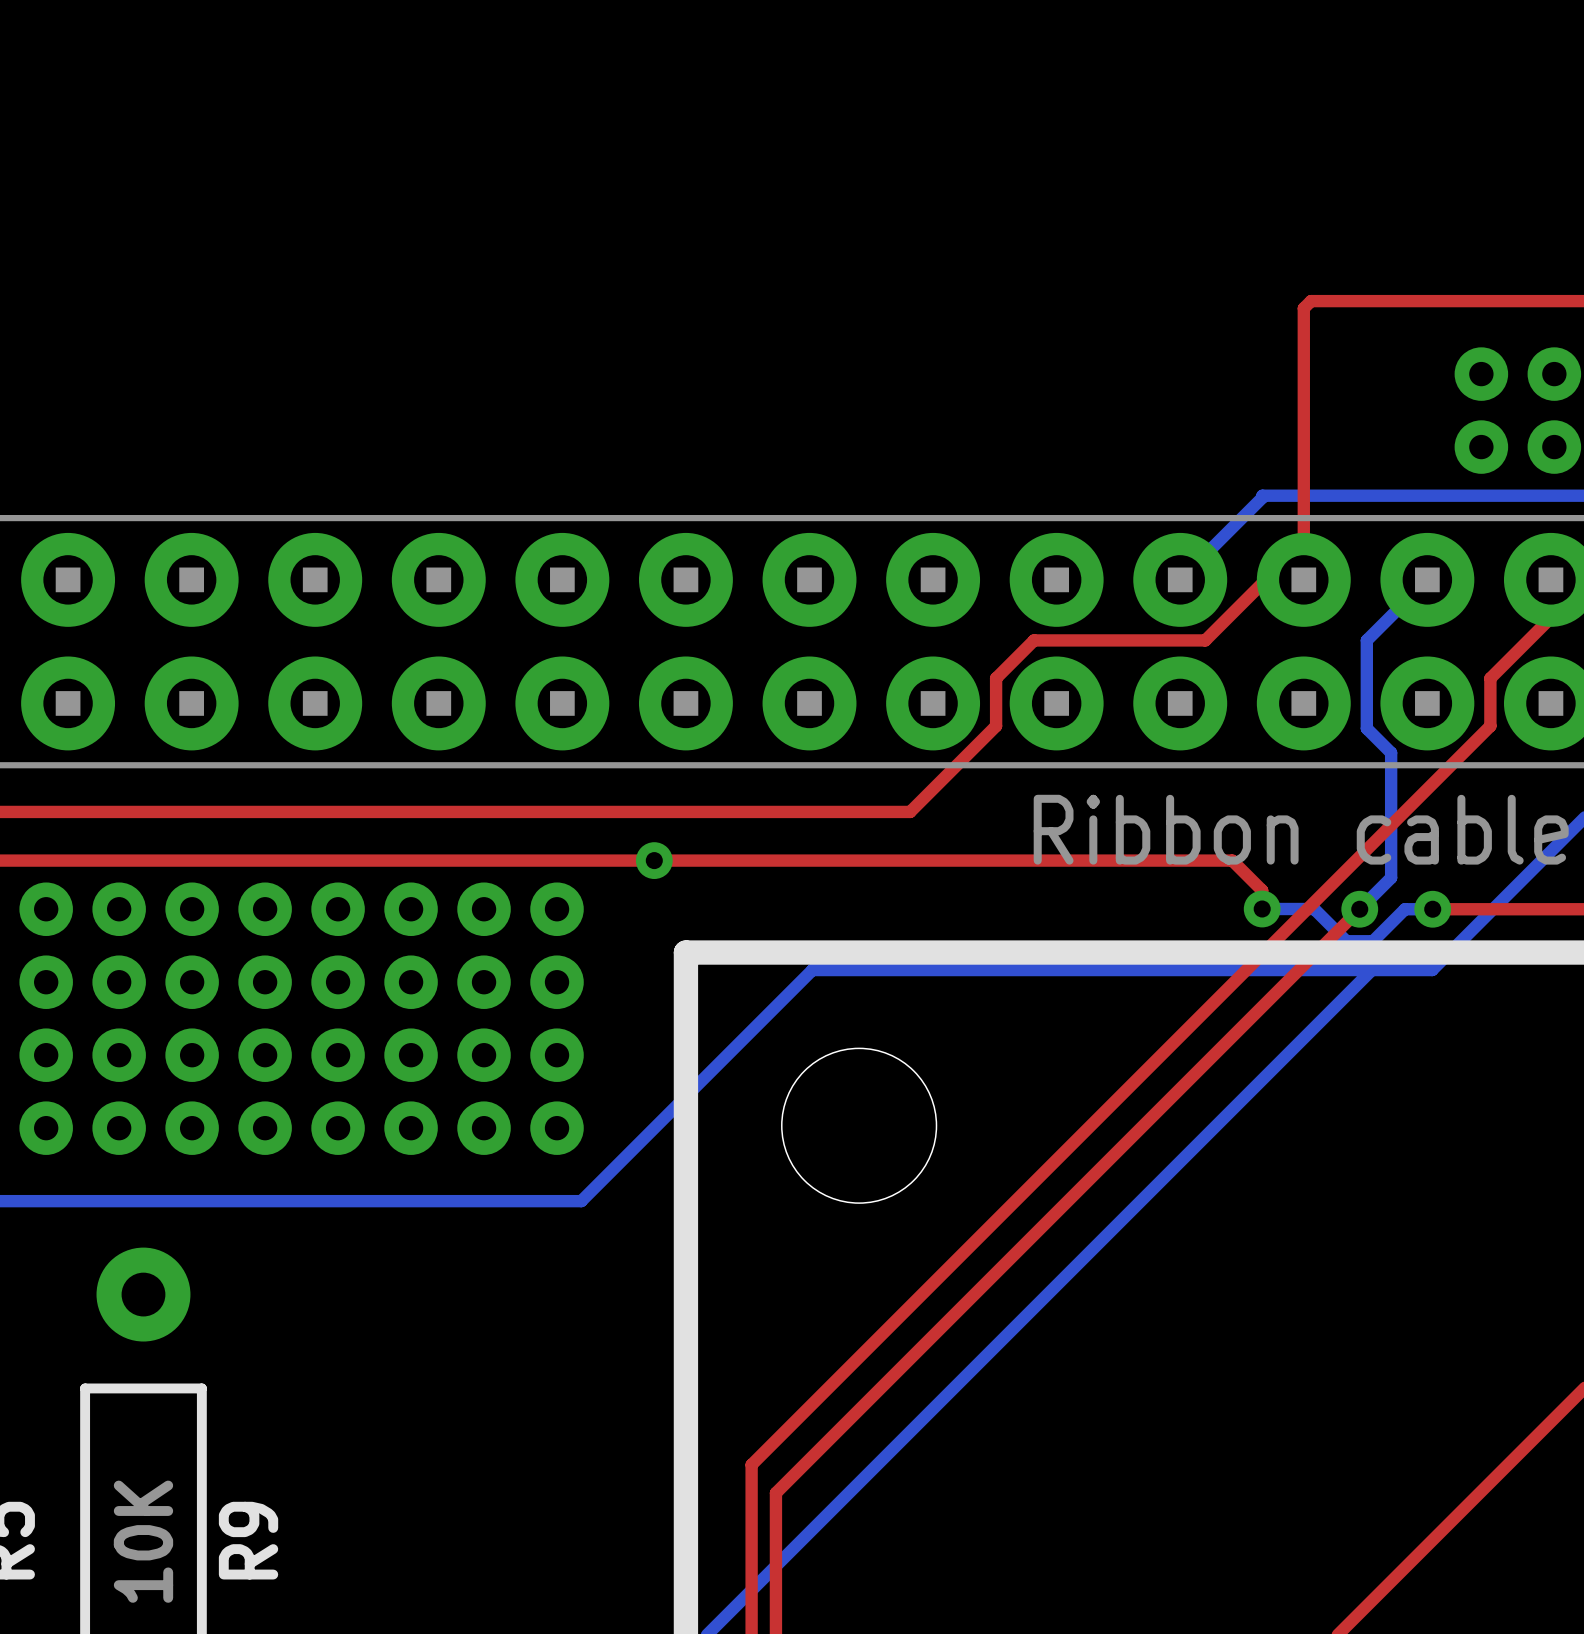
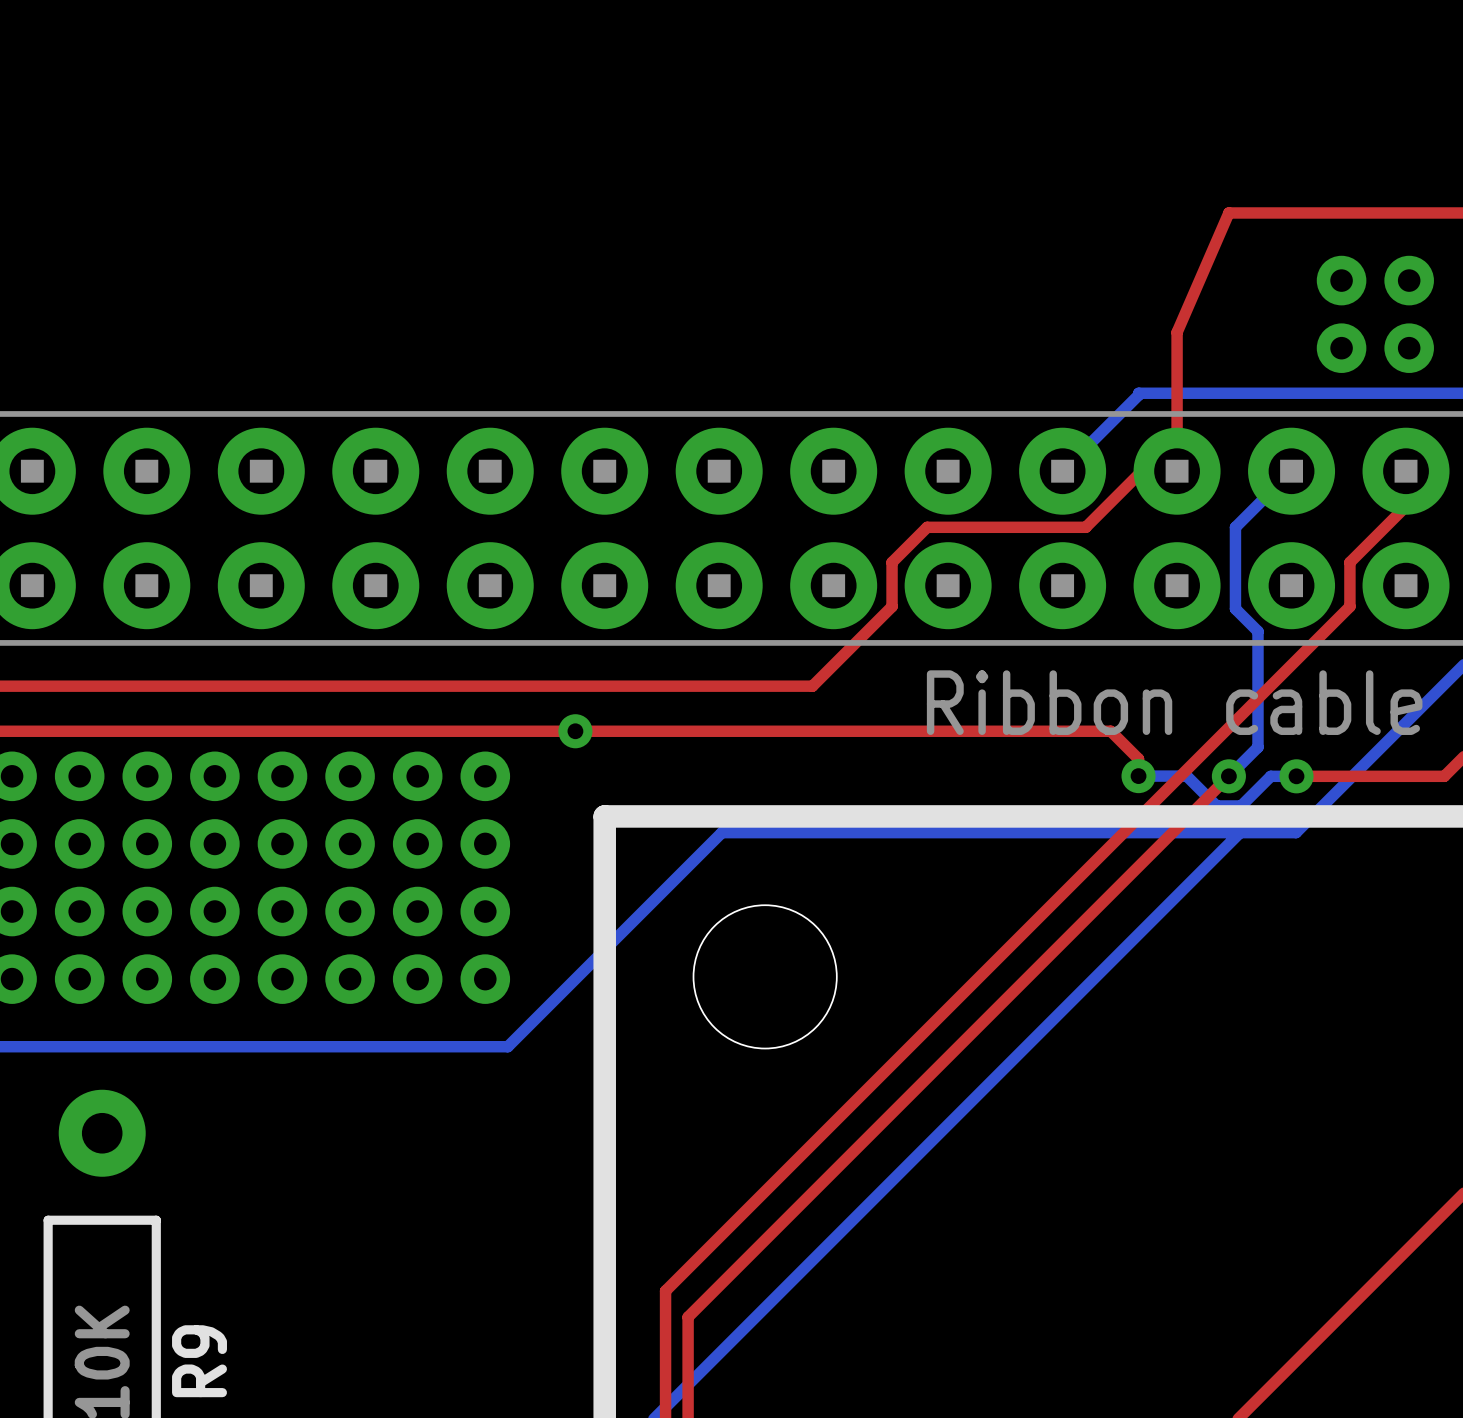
top track: (1359, 301) (1311, 301) (1303, 308) (1303, 430) -> (1228, 212) (1177, 332)

